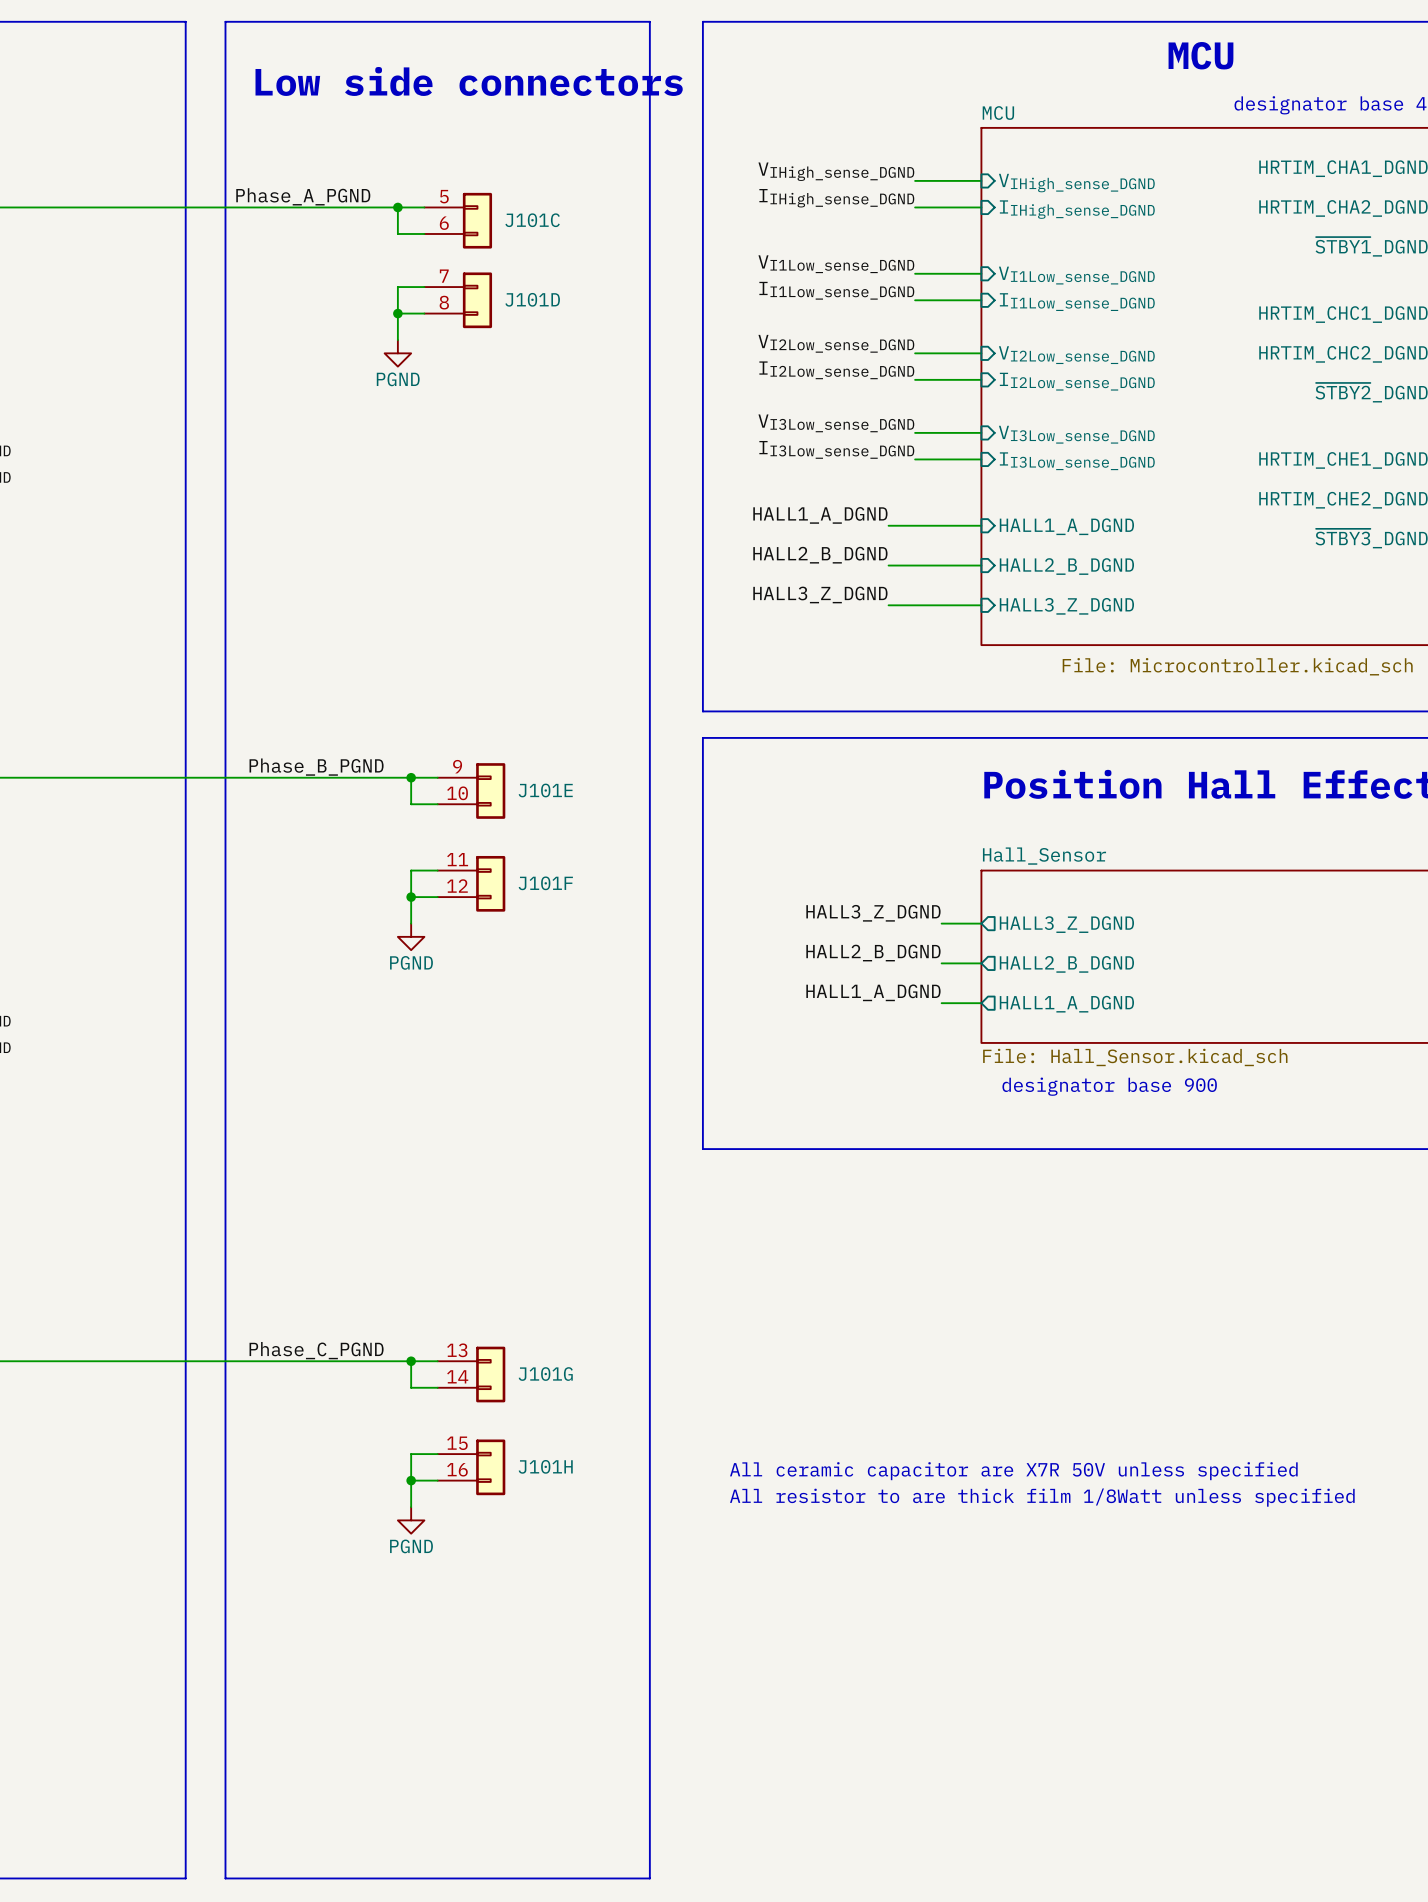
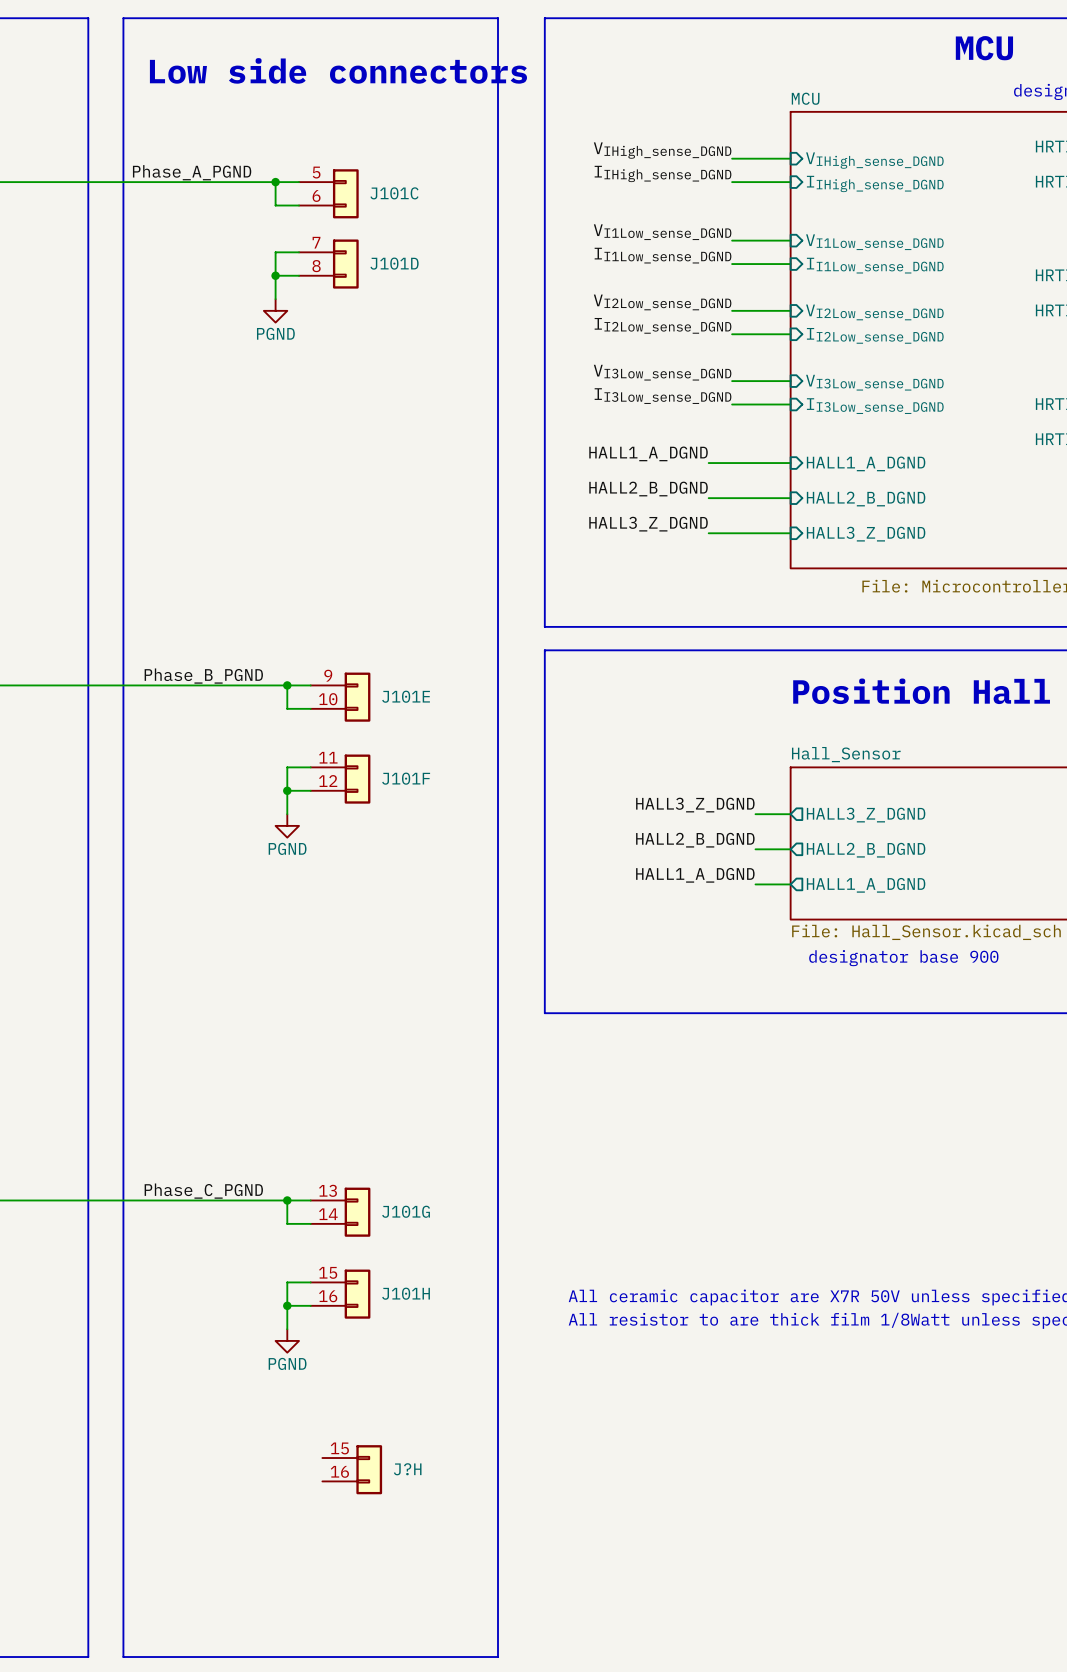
J?H: none -> (352, 1469)

